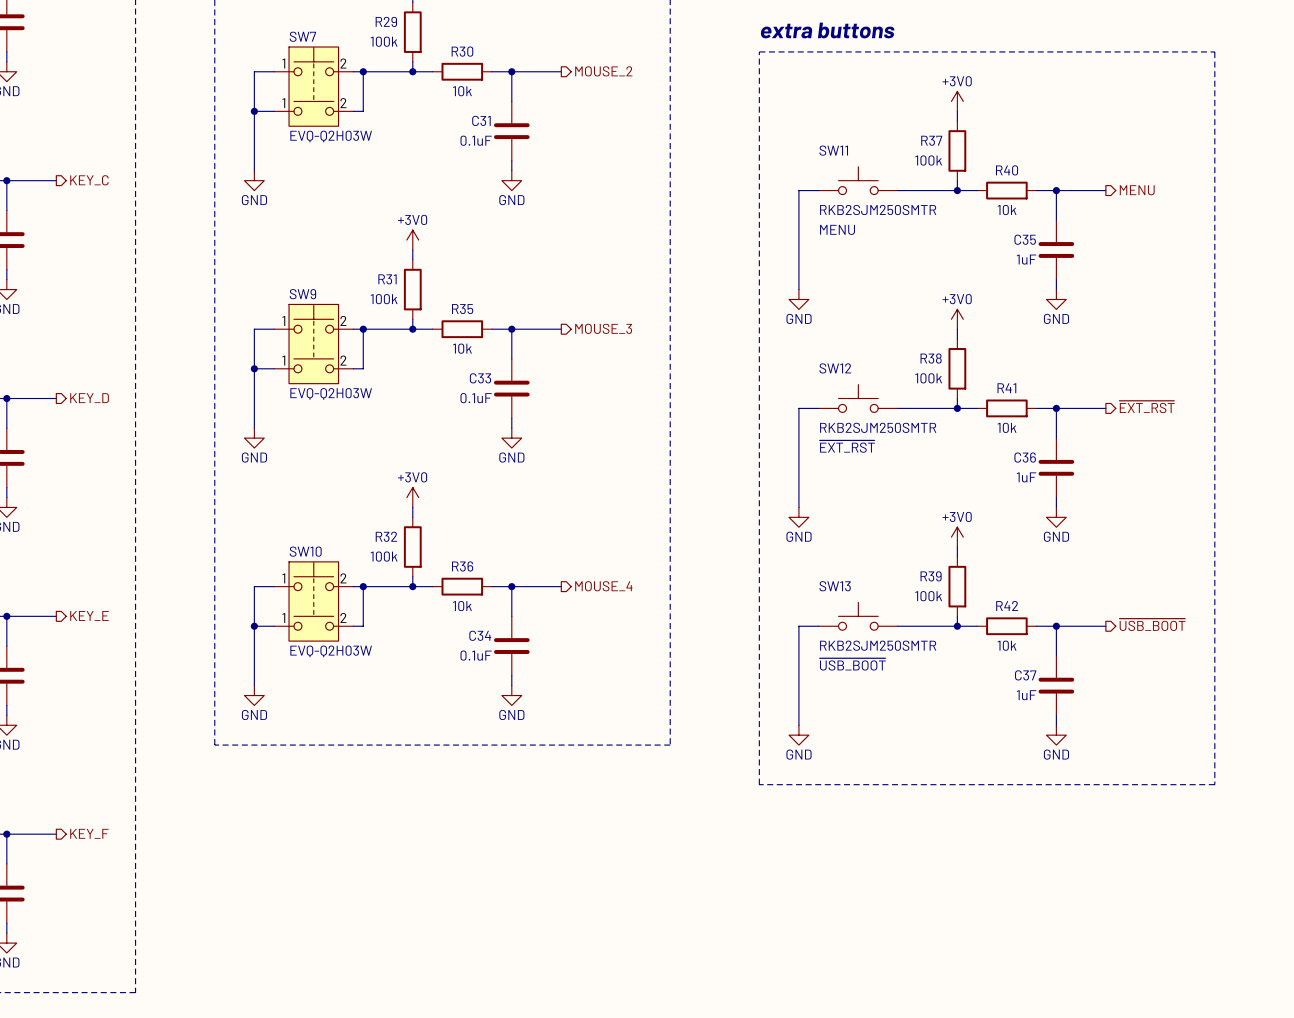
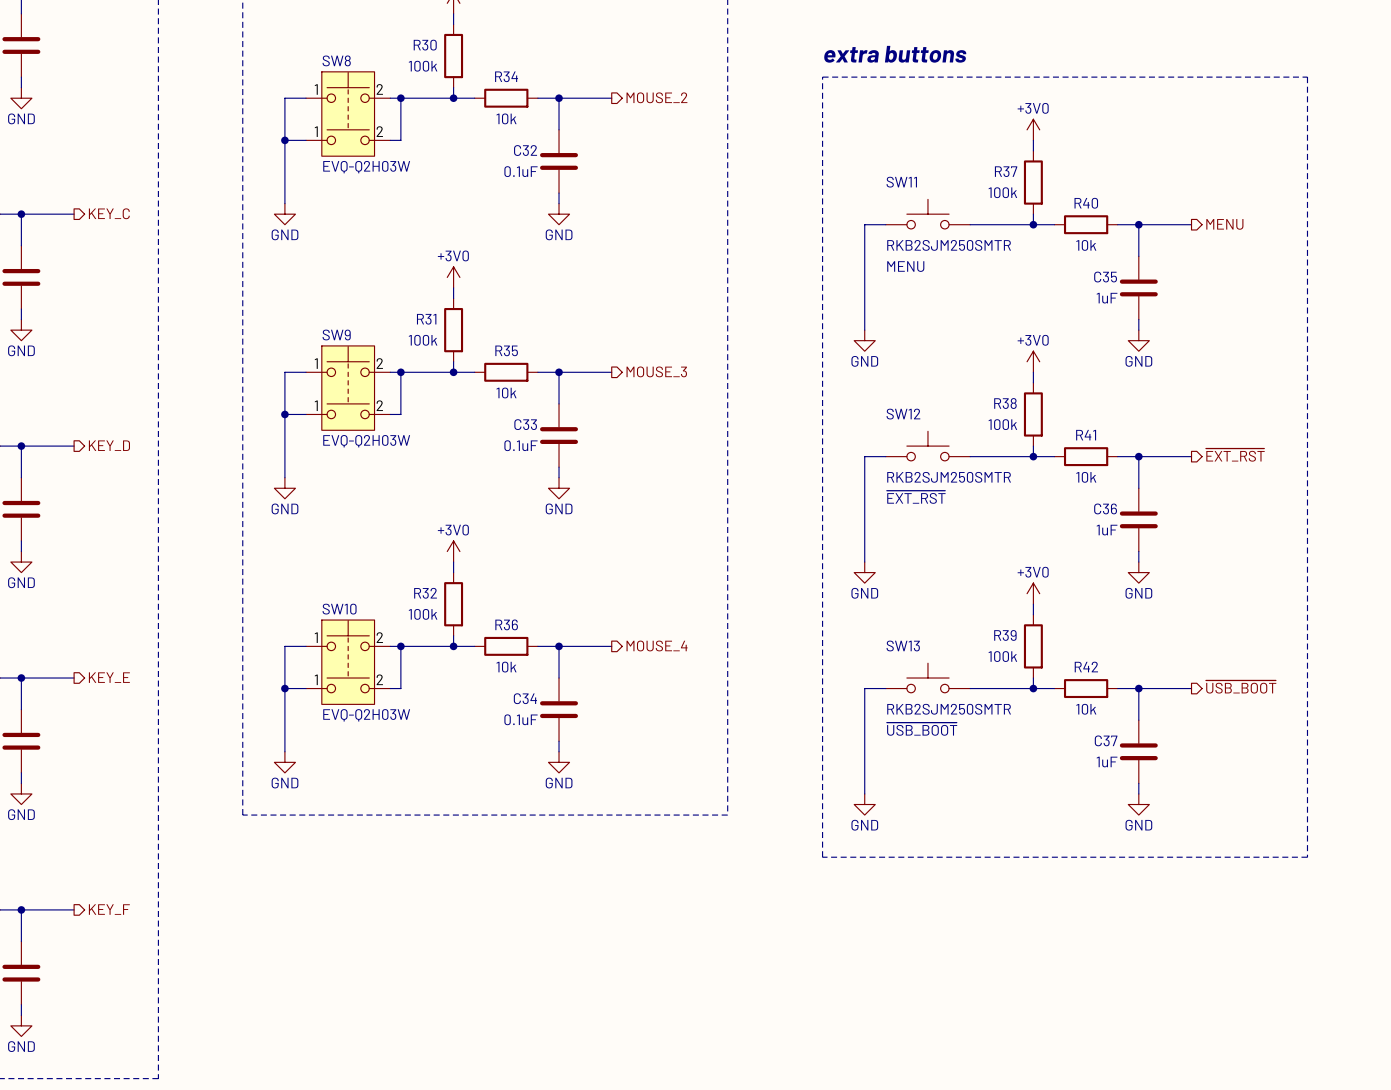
R29 name: R29 (386, 21) -> R30 (425, 45)
SW7 name: SW7 (302, 36) -> SW8 (336, 60)
R30 name: R30 (462, 51) -> R34 (506, 76)
C31 name: C31 (481, 120) -> C32 (525, 150)

